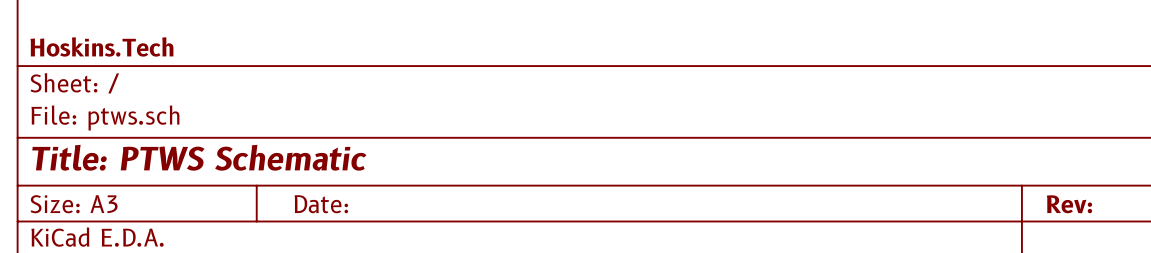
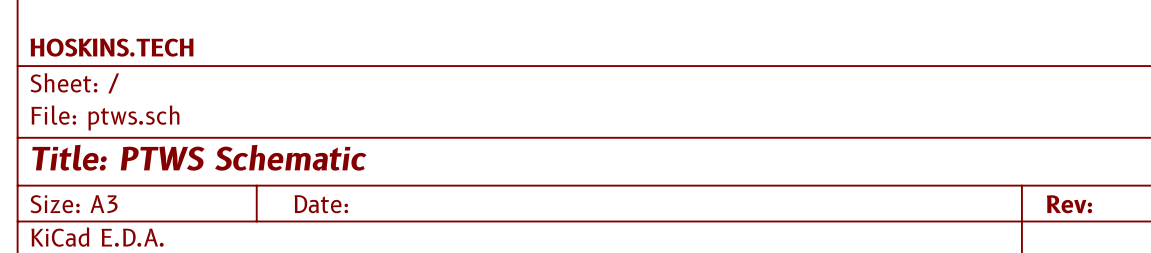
title block: Hoskins.Tech (101, 46) -> HOSKINS.TECH (111, 47)

